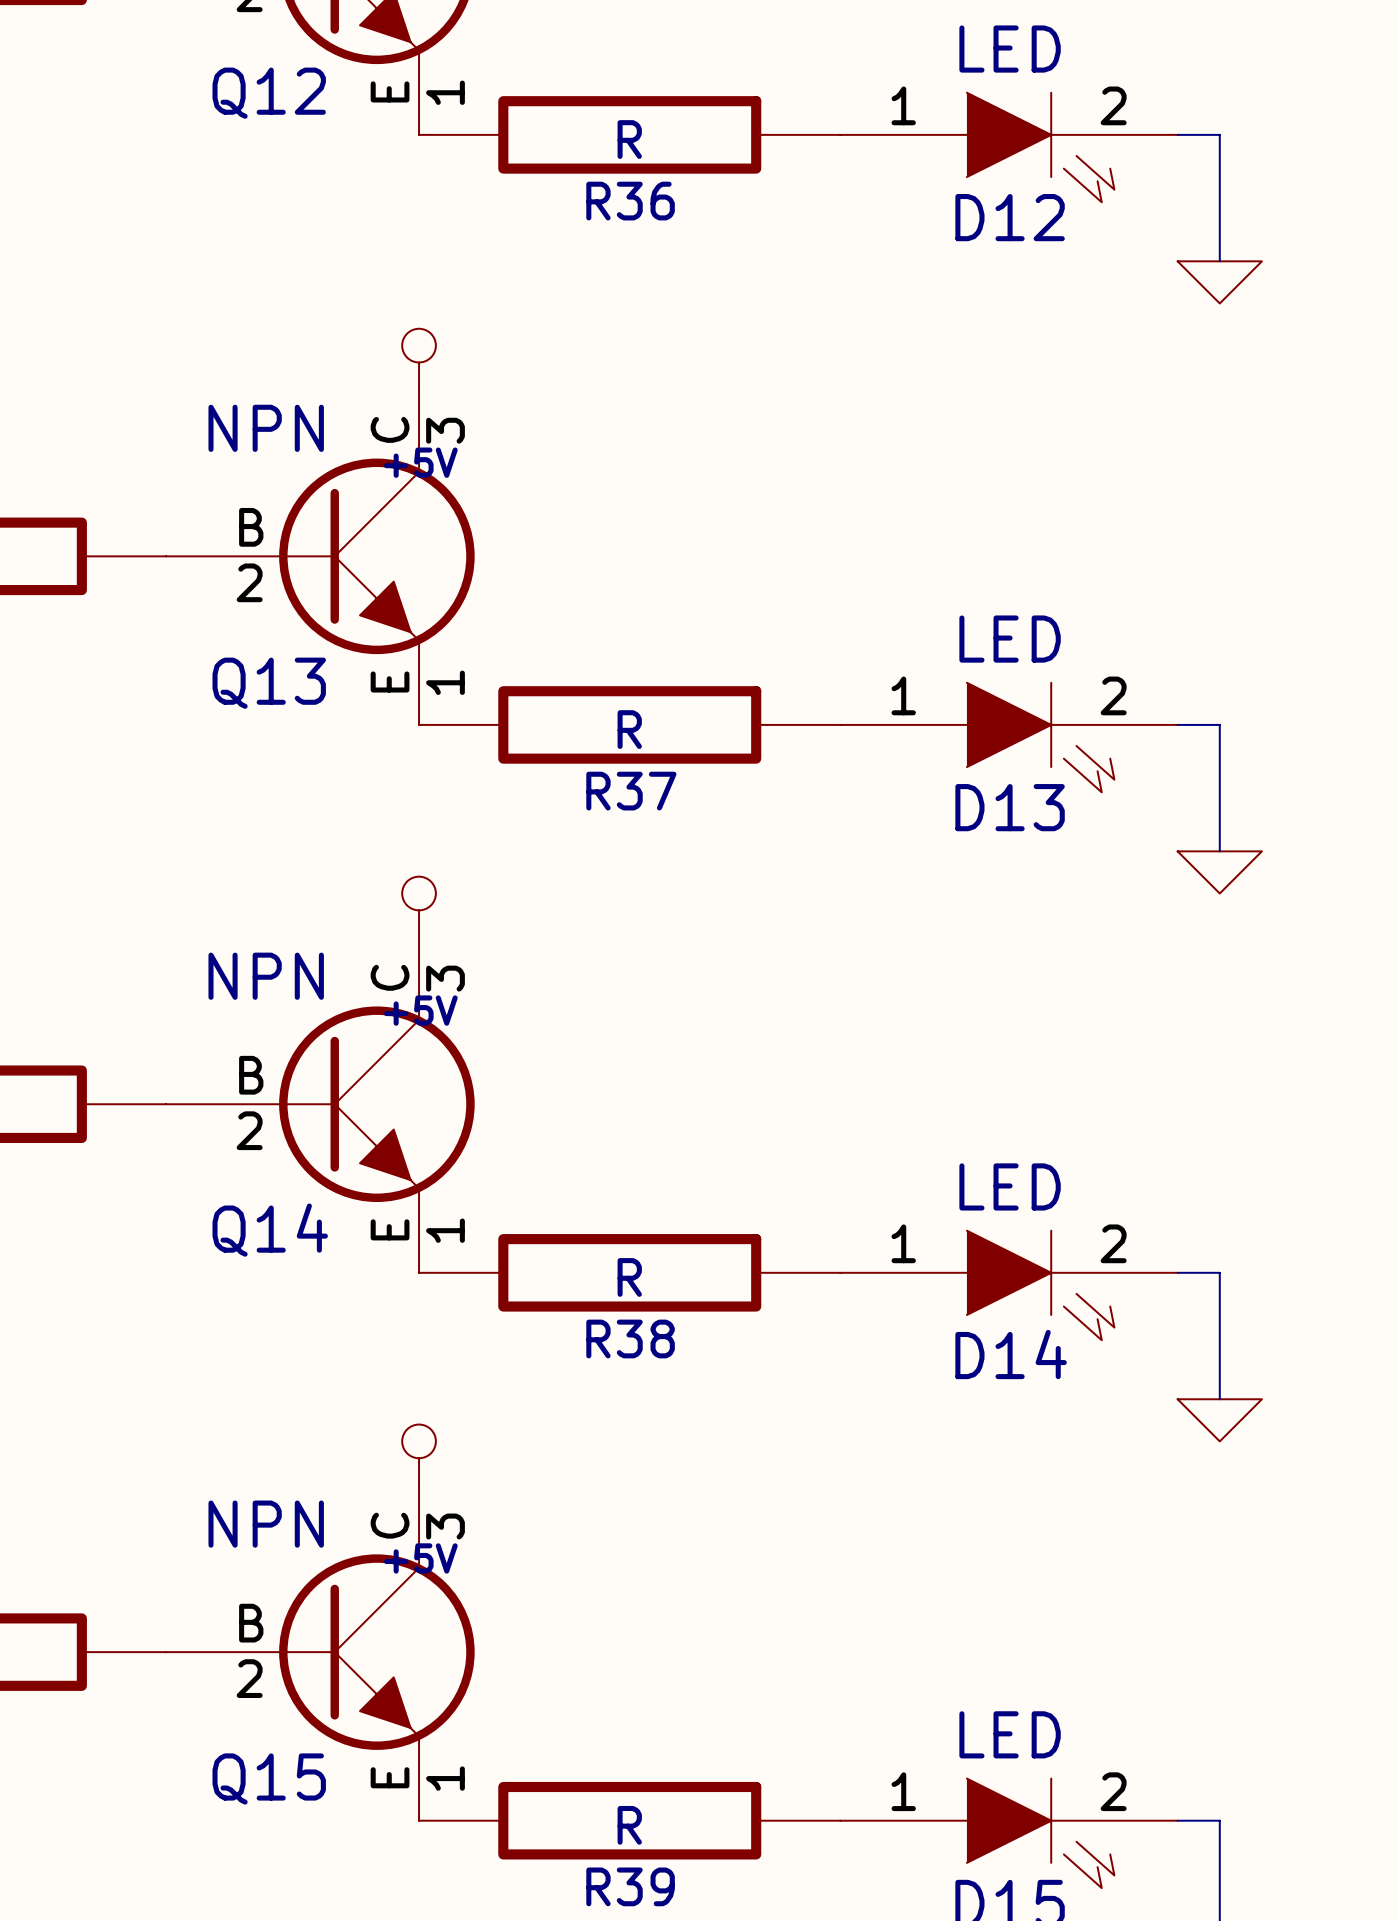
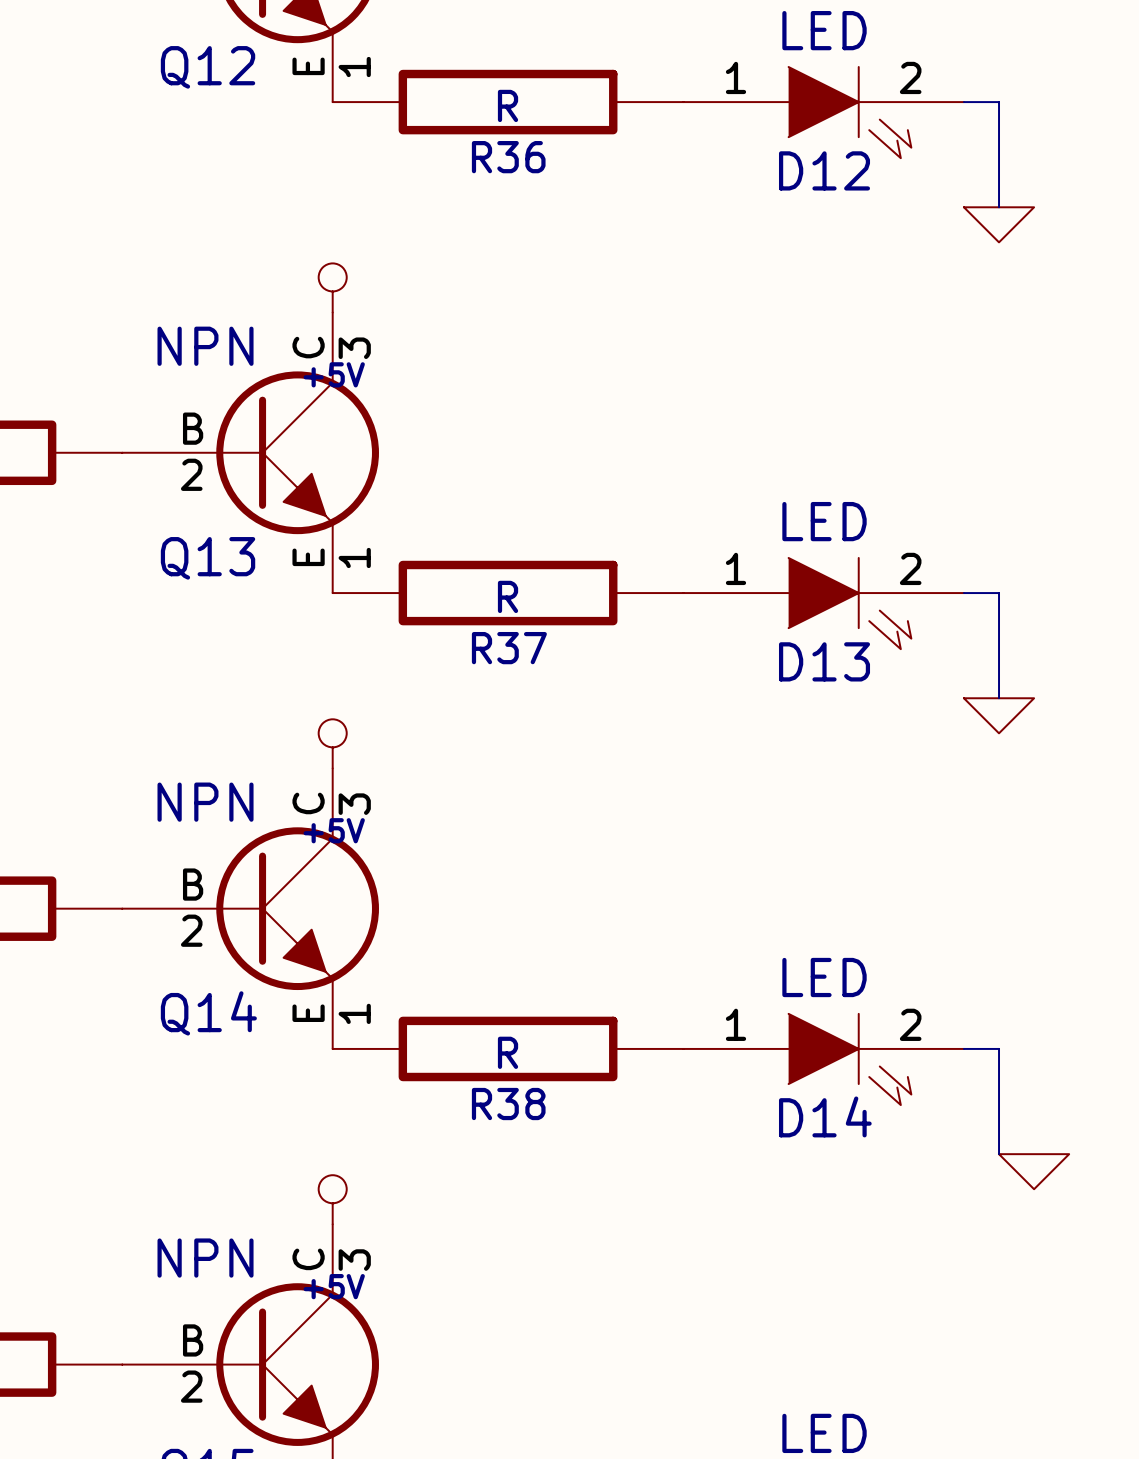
power symbol position: (1219, 1420) -> (1034, 1171)

